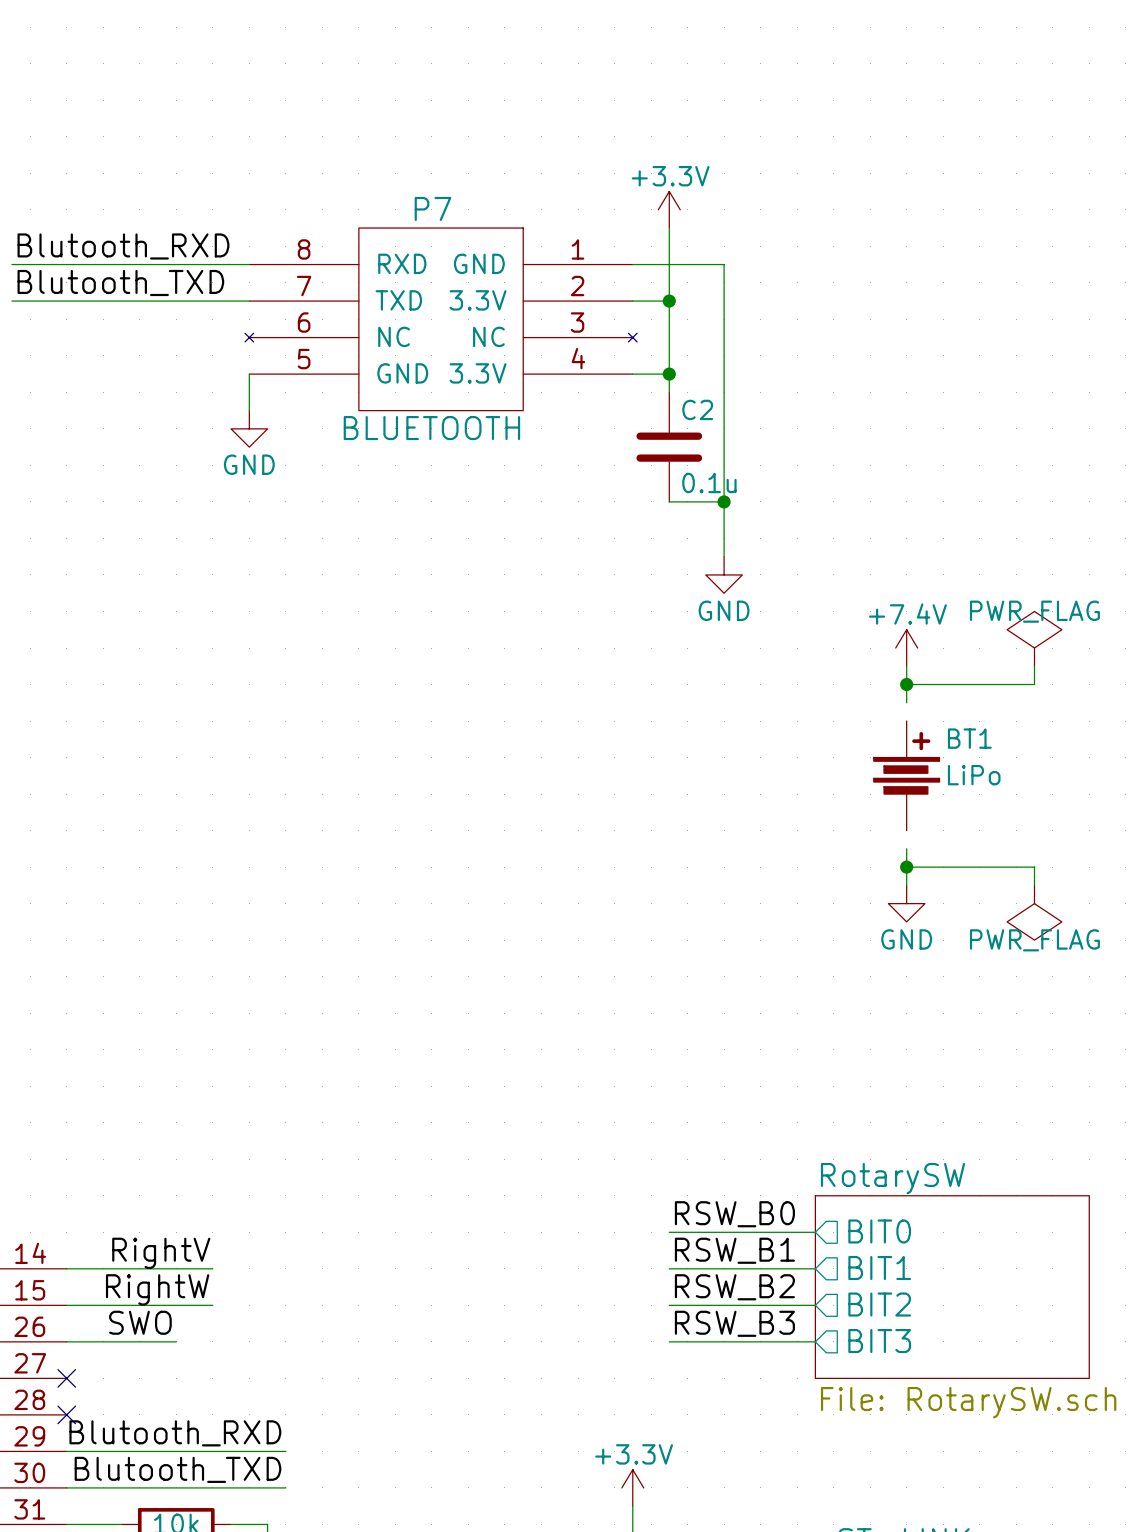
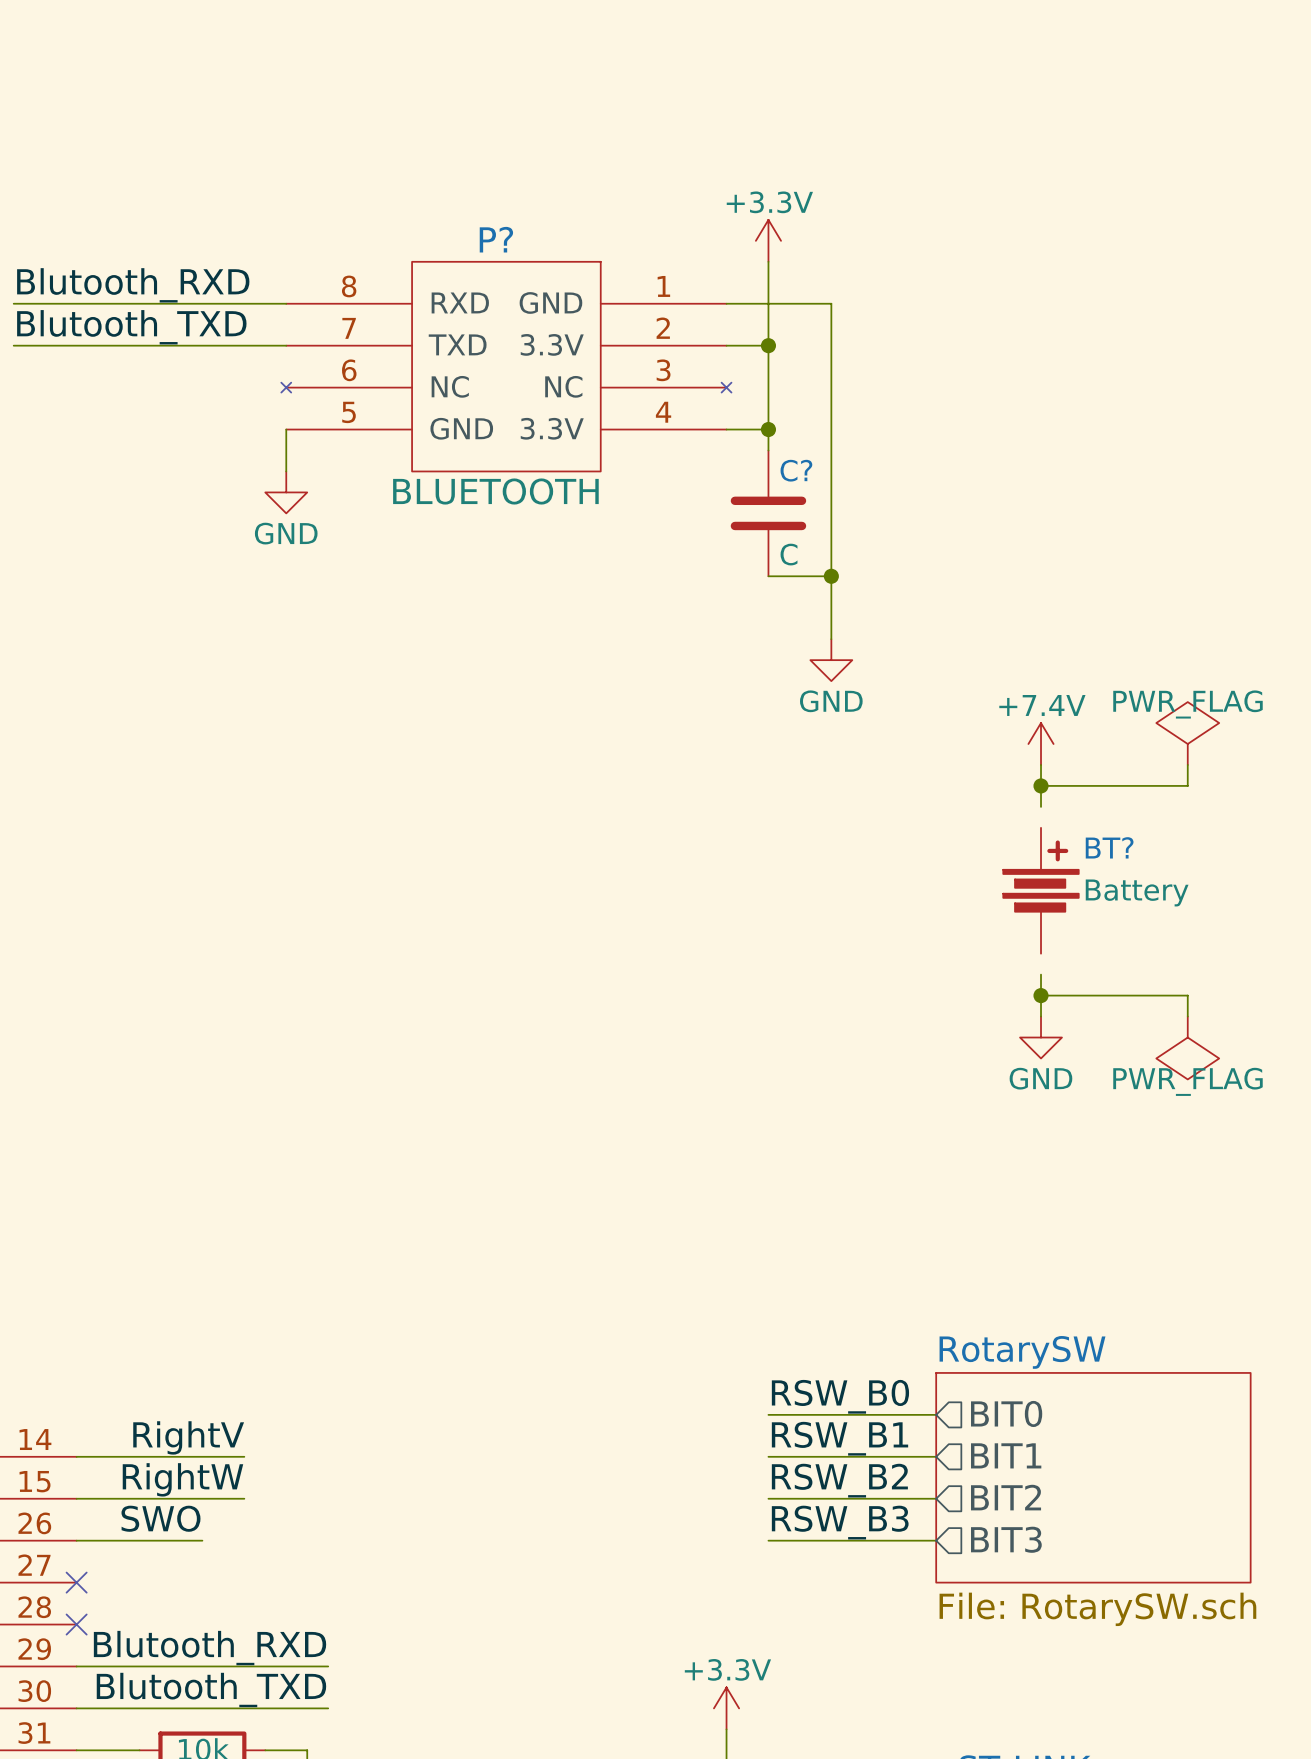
P7 name: P7 (432, 208) -> P? (496, 239)
C2 name: C2 (697, 409) -> C? (796, 470)
C2 value: 0.1u (709, 482) -> C (789, 554)
BT1 name: BT1 (969, 738) -> BT? (1109, 847)
BT1 value: LiPo (974, 775) -> Battery (1137, 892)

